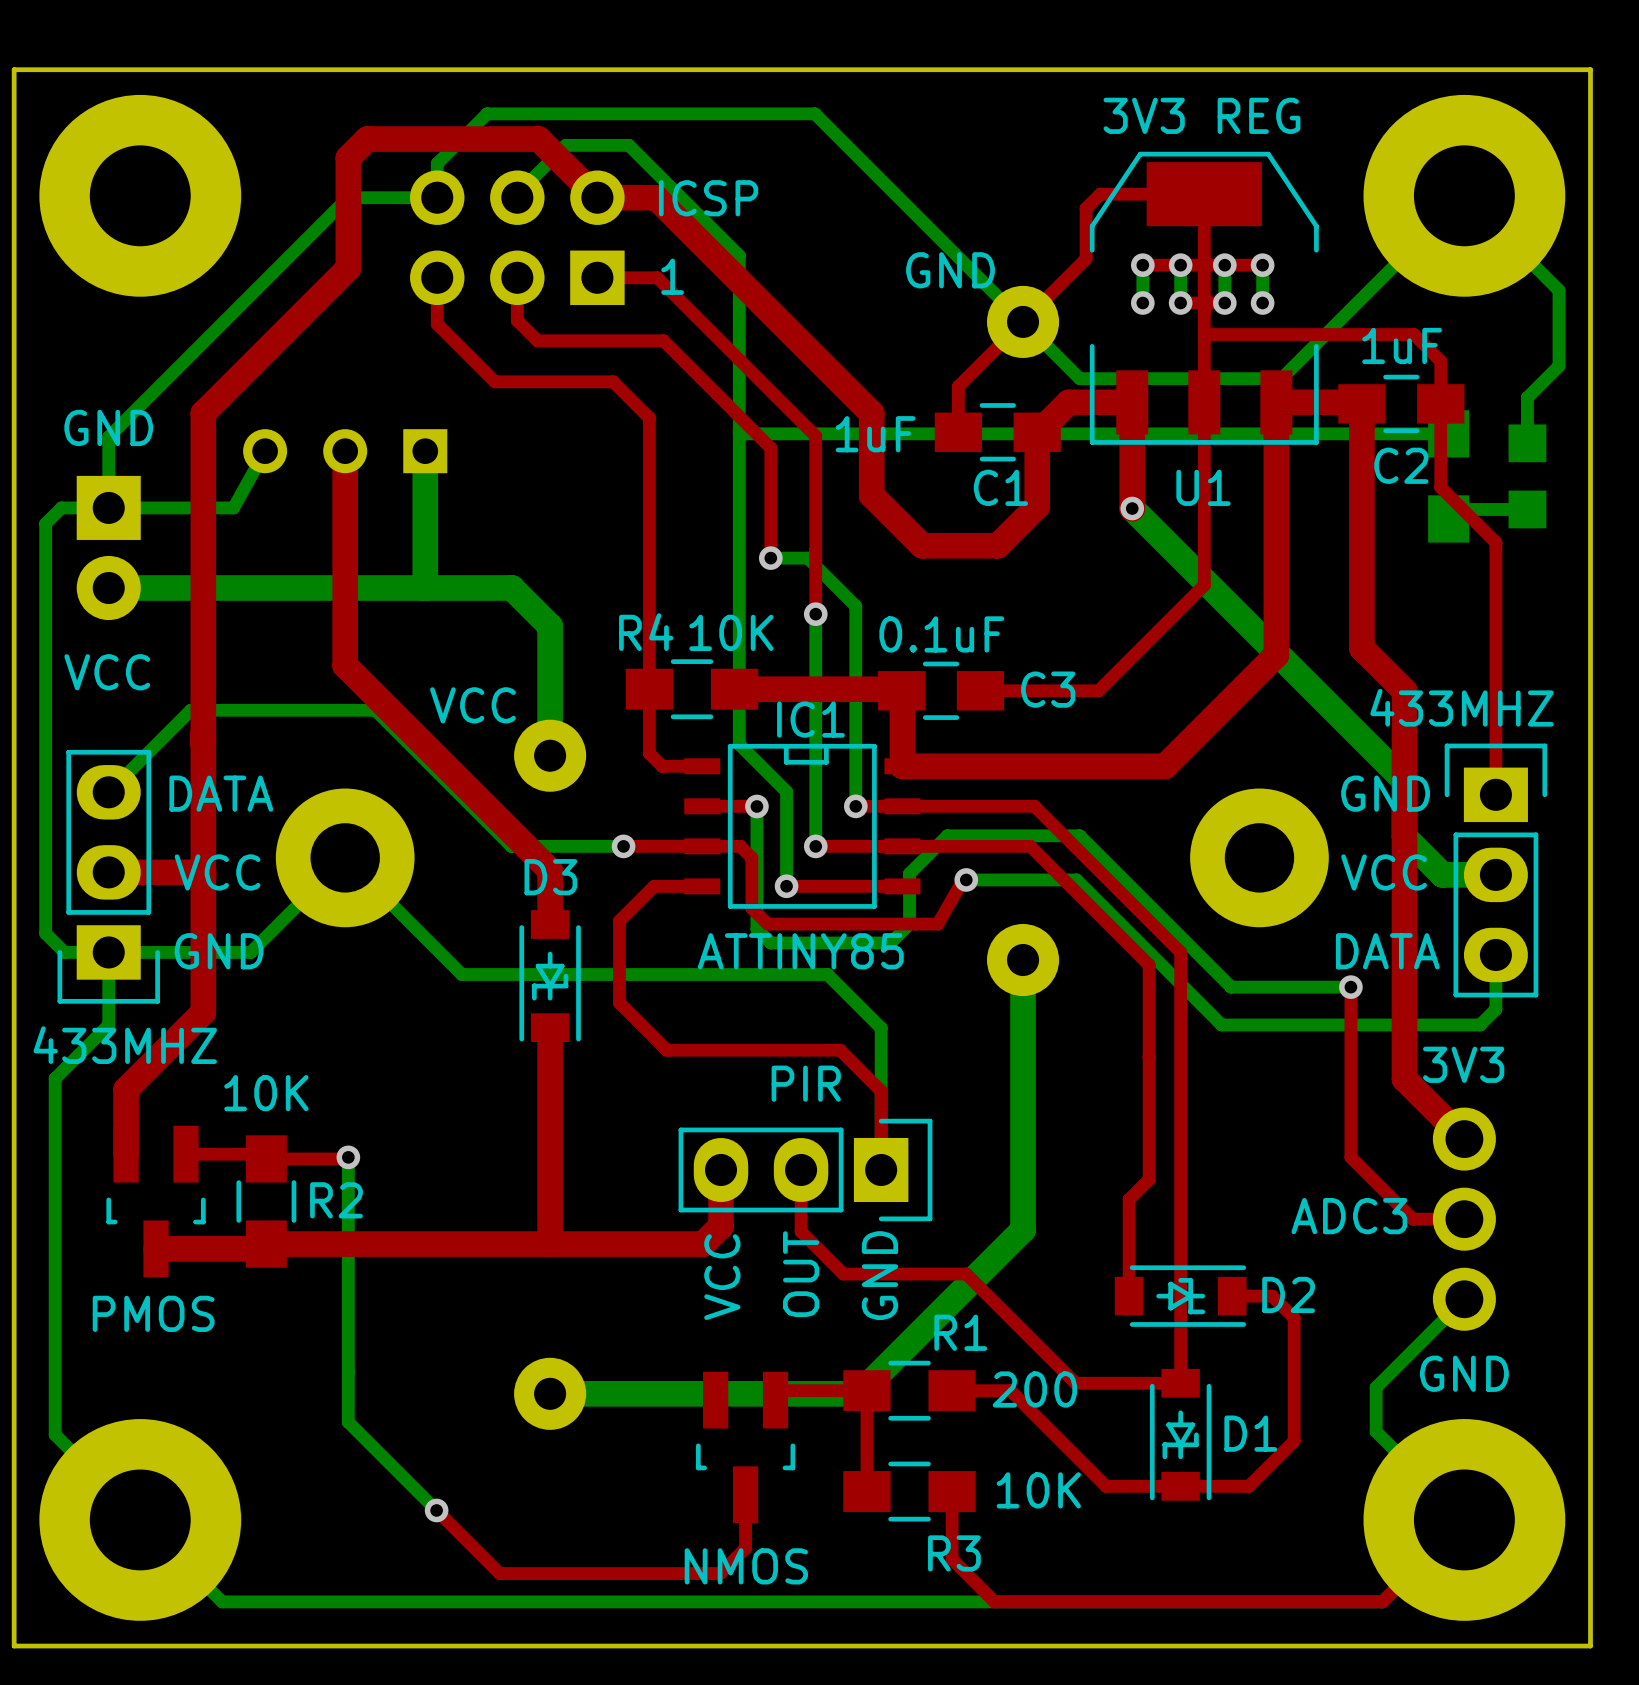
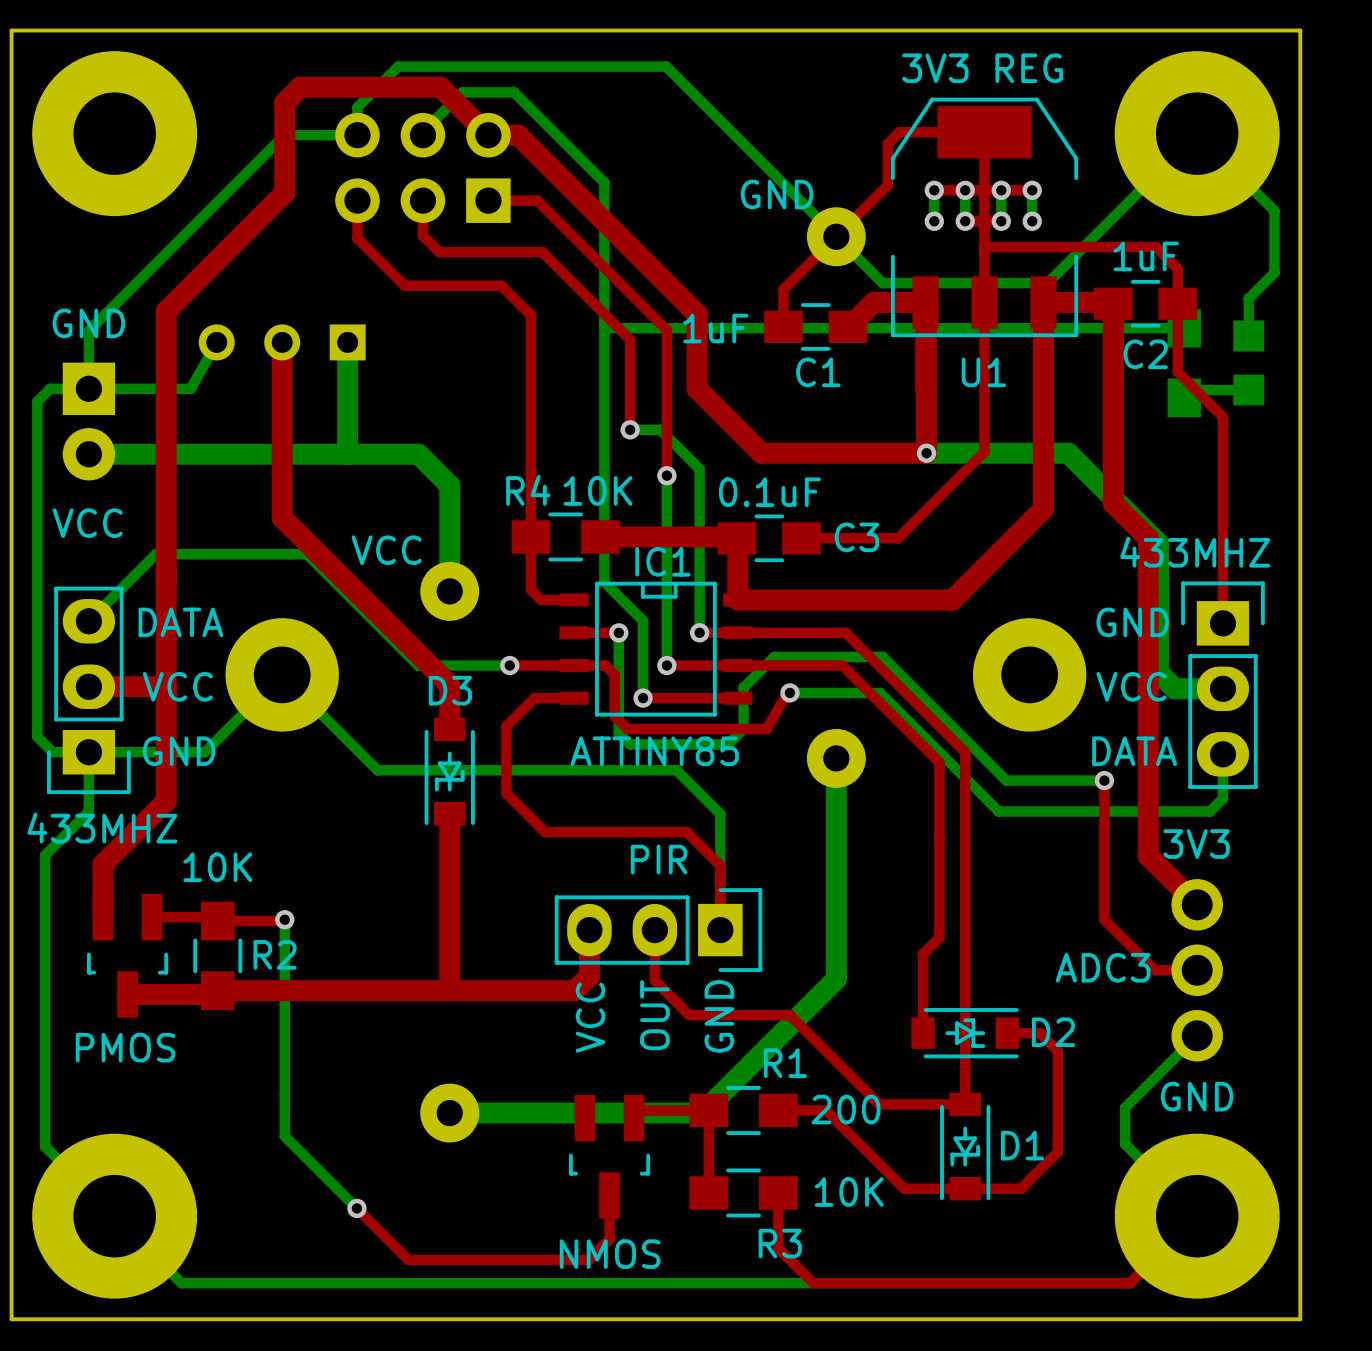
top track: (633, 197) (656, 197) (871, 413) (871, 495) (922, 545) (997, 545) (1037, 506) (1037, 432) -> (518, 135) (697, 314) (697, 388) (761, 453) (926, 453) (926, 303)
text: ICSP (708, 198) -> none
text: 1 (672, 276) -> none
bottom track: (1132, 508) (1404, 780) (1404, 836) (1442, 874) -> (926, 453) (1068, 453) (1158, 543) (1158, 672) (1175, 688) (1179, 688)
via position: (1132, 508) -> (926, 453)

